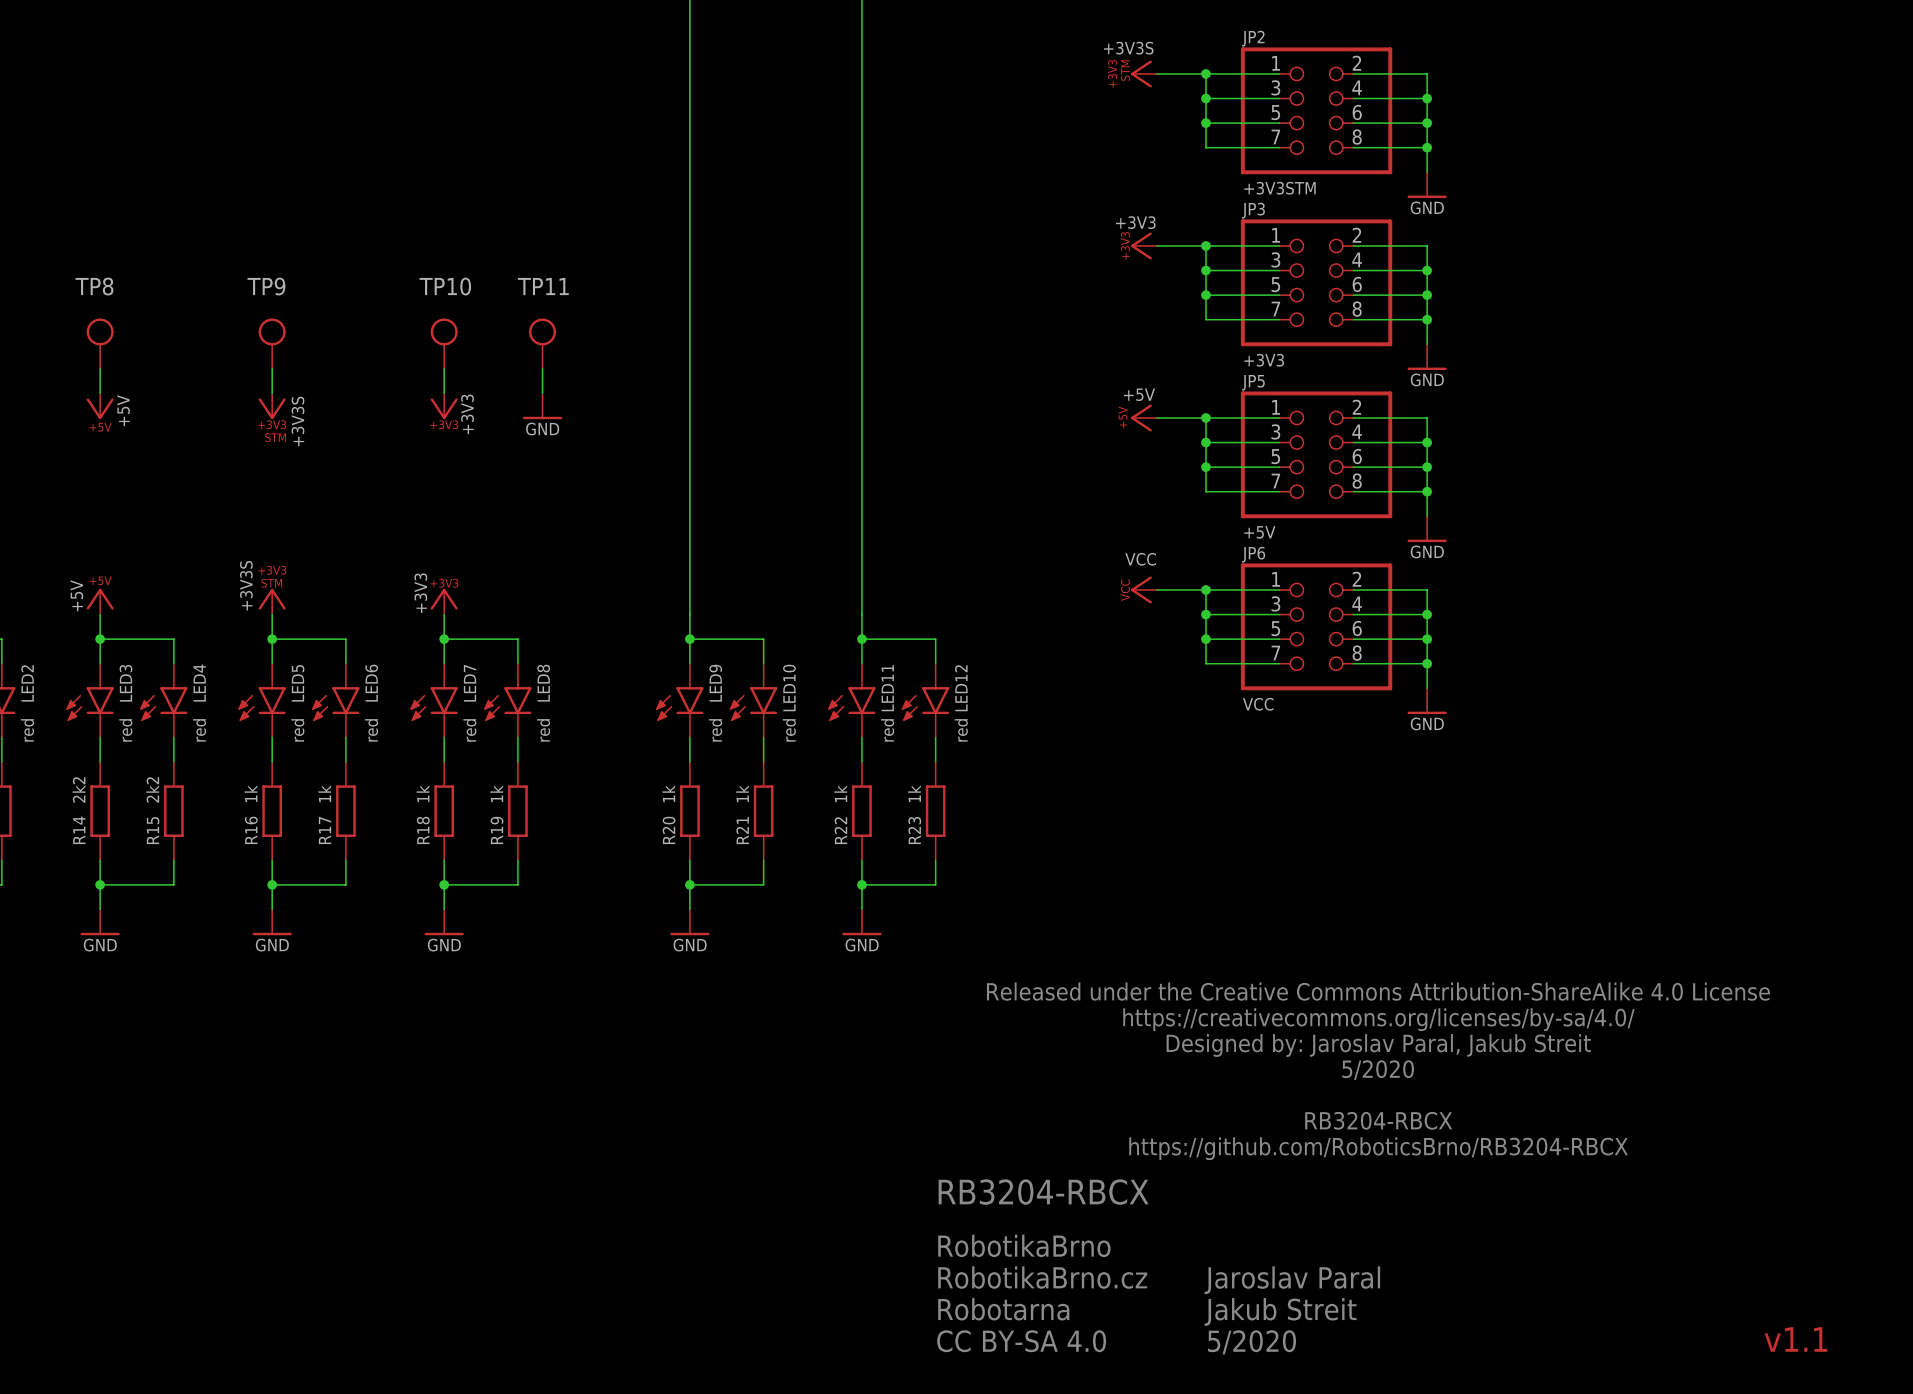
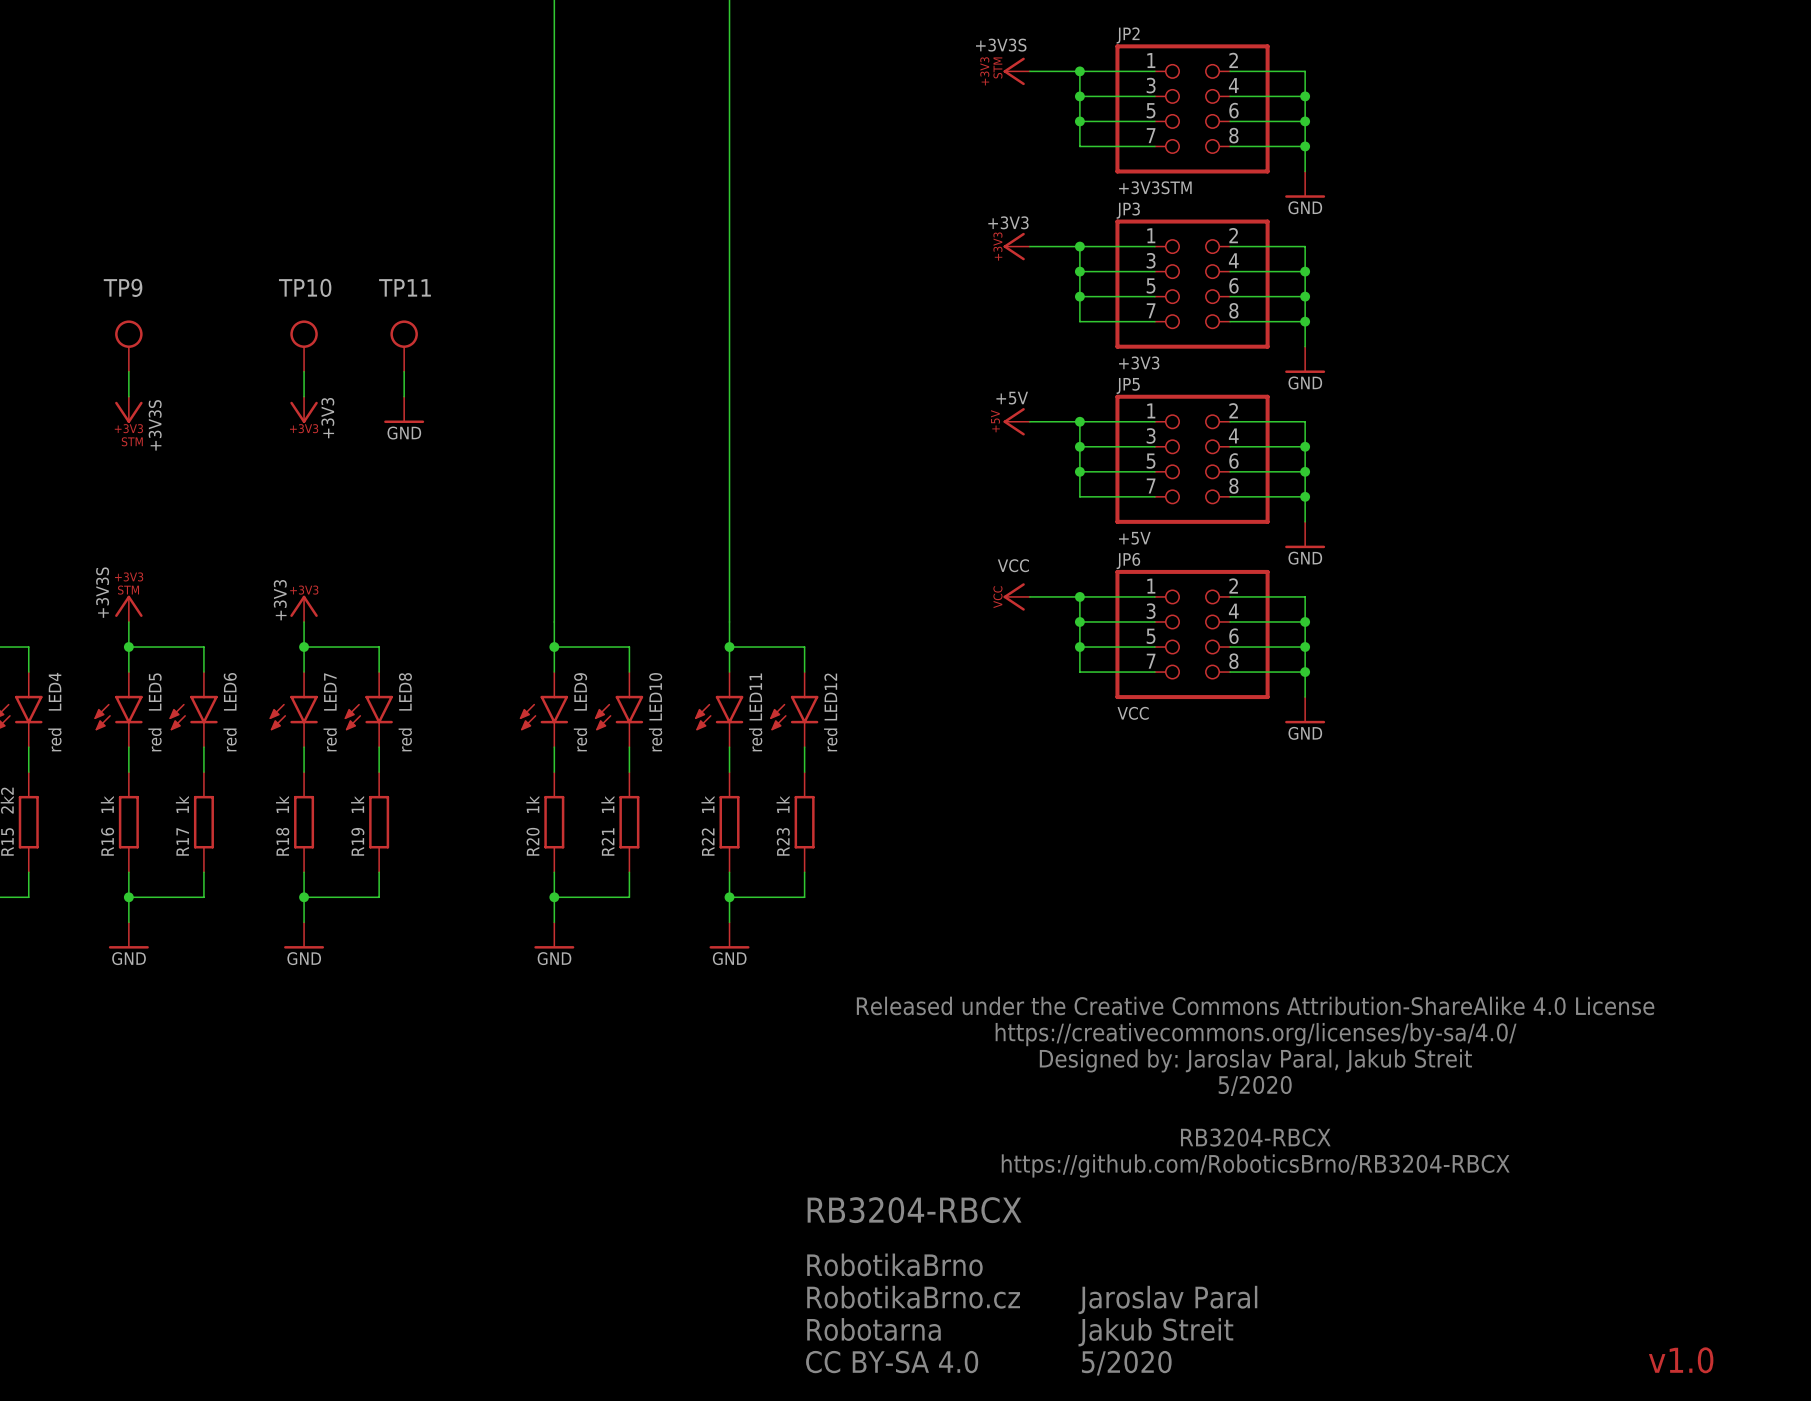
text: v1.1 (1795, 1339) -> v1.0 (1681, 1360)

